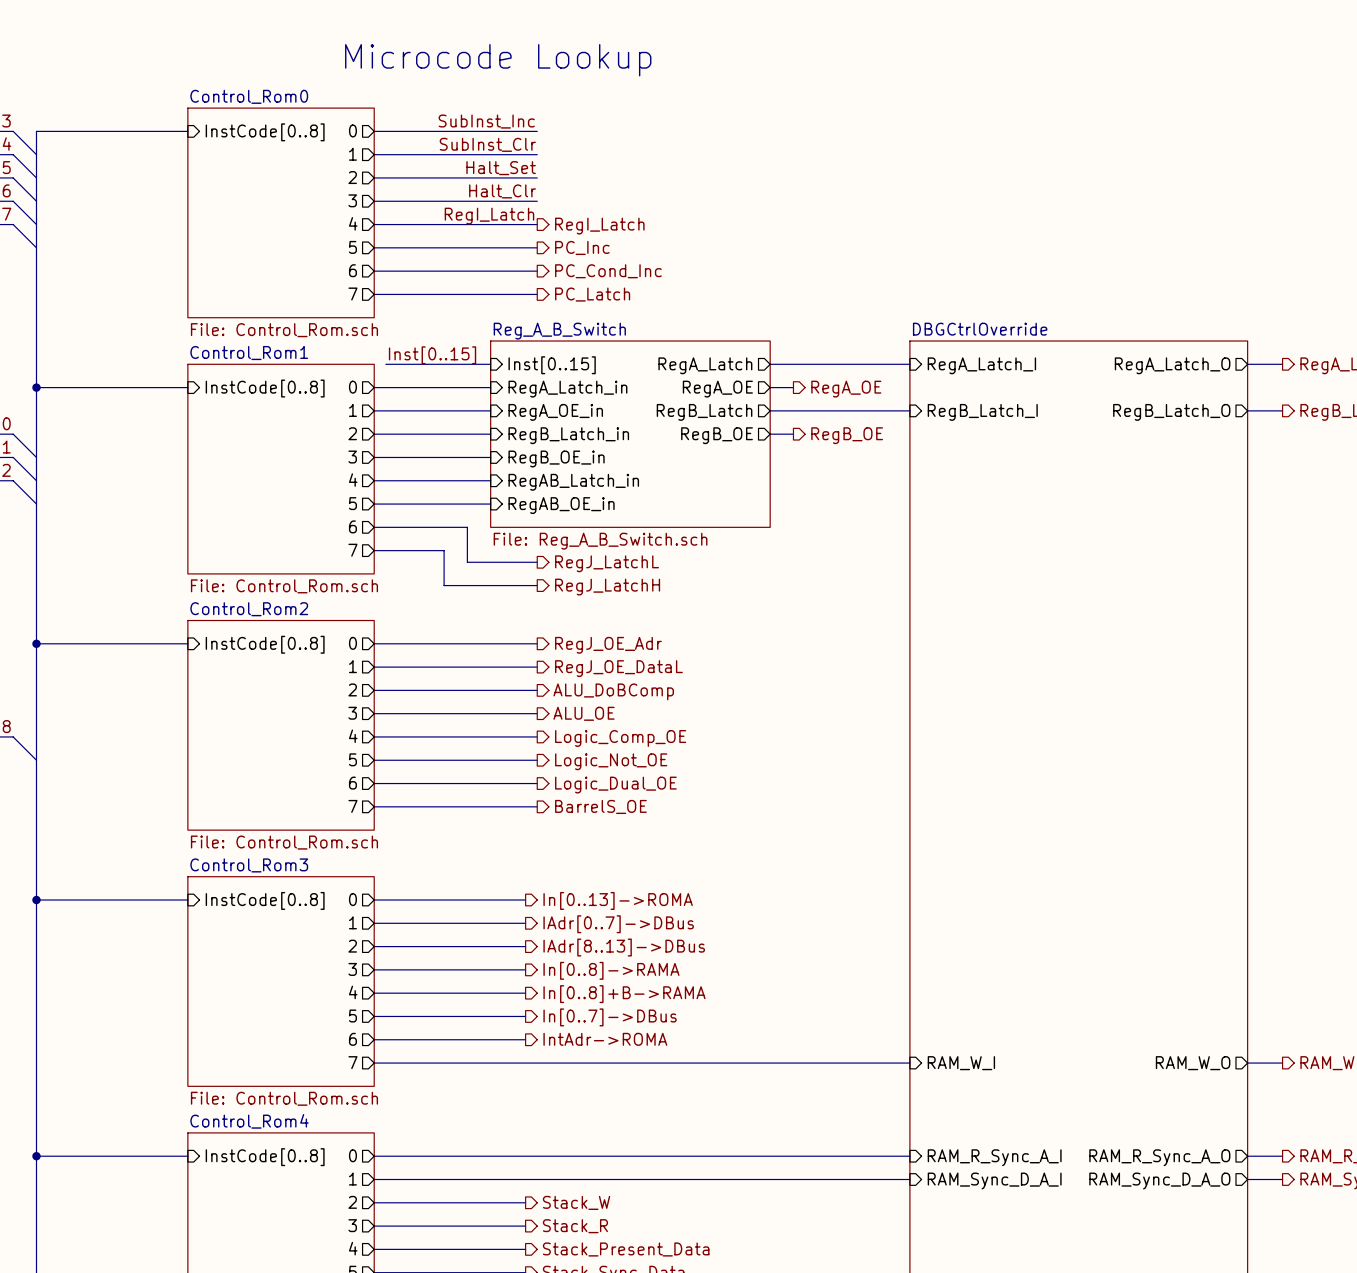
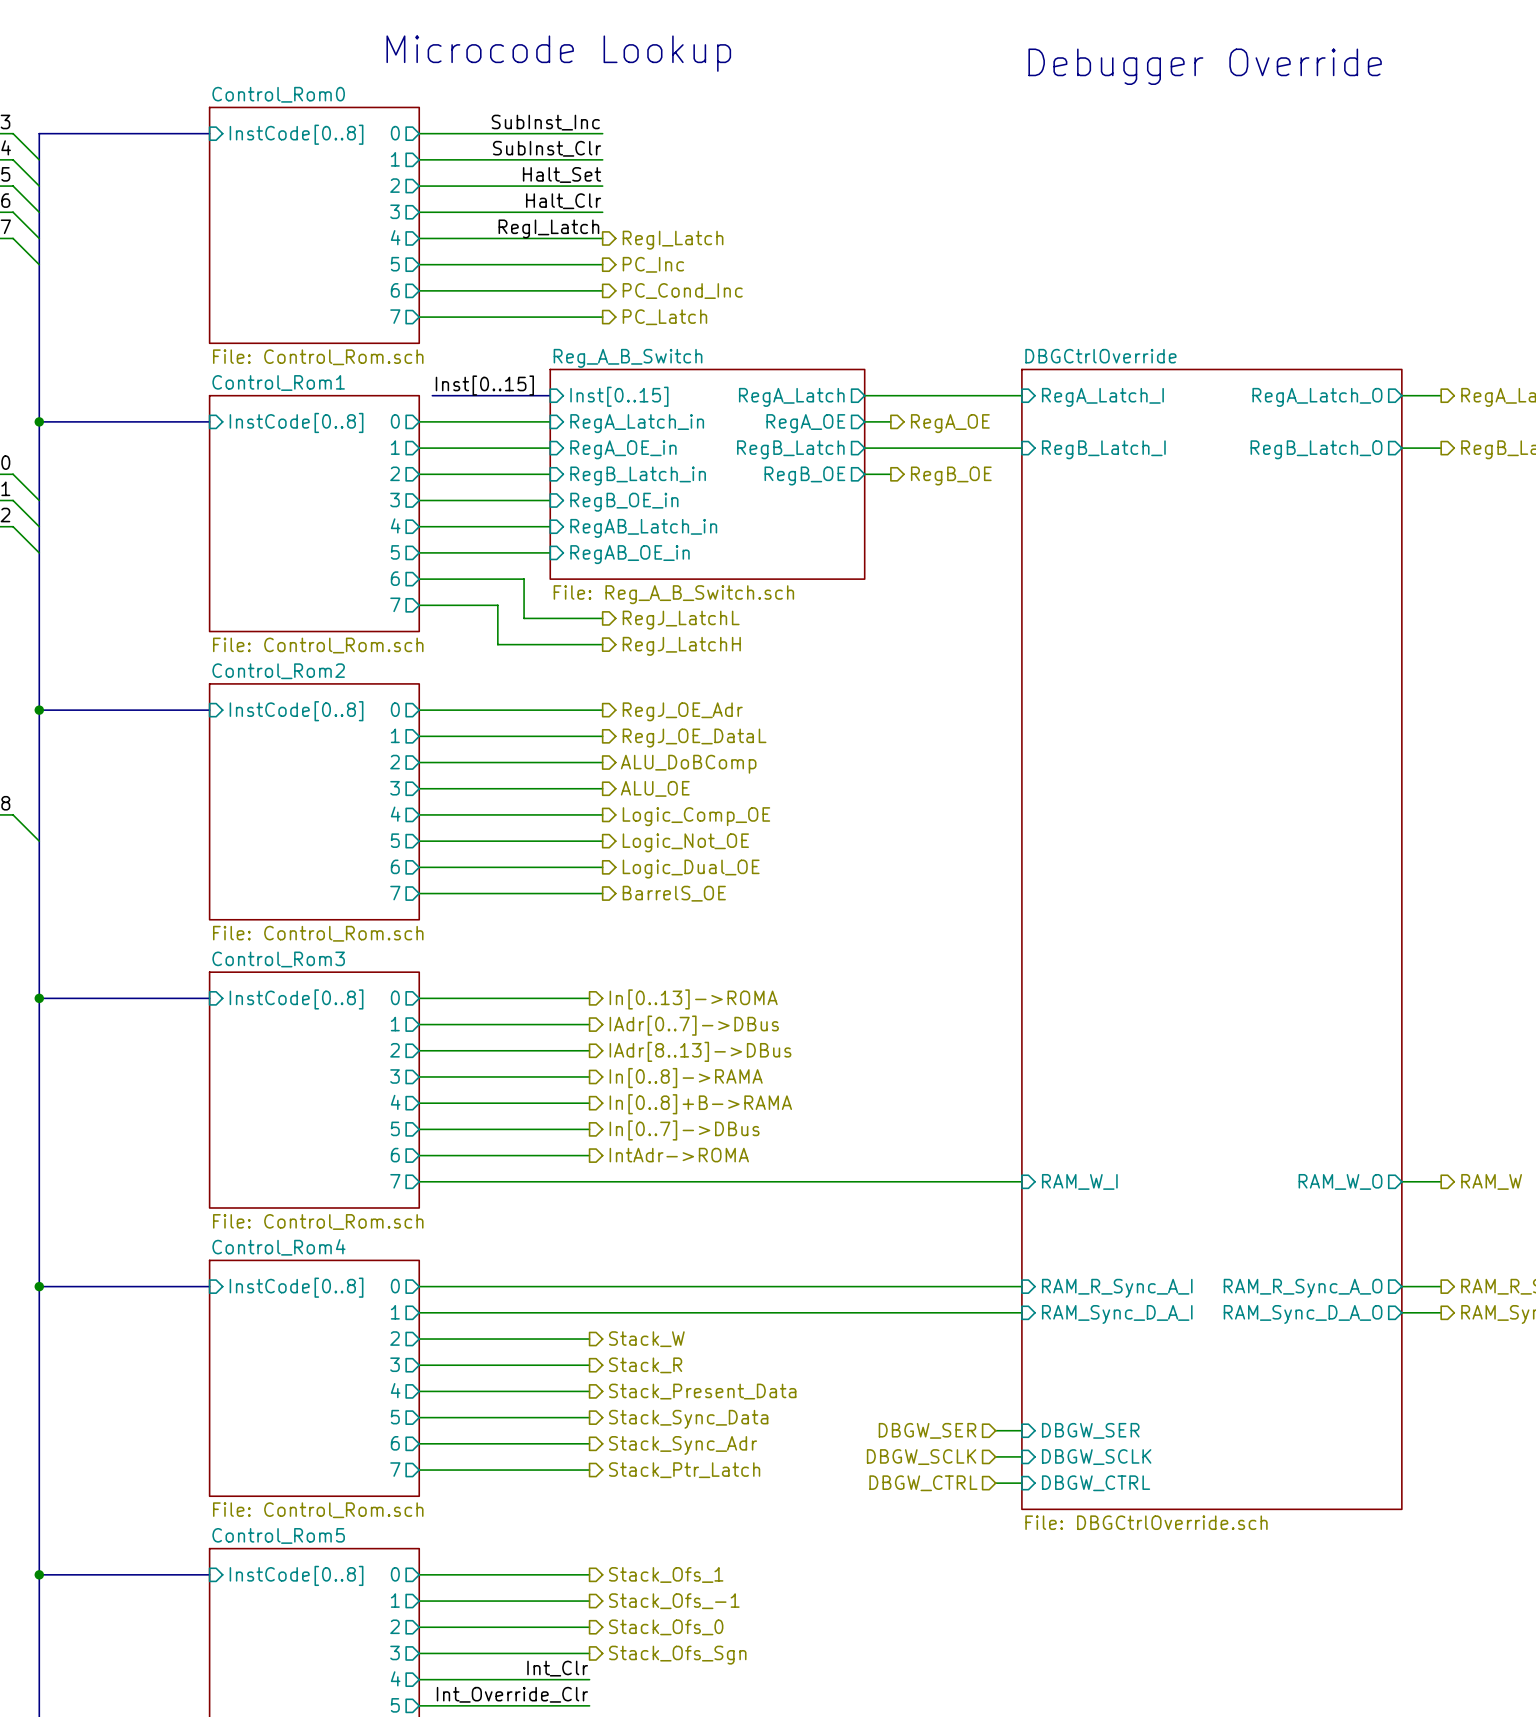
text: none -> Debugger Override (1205, 66)

